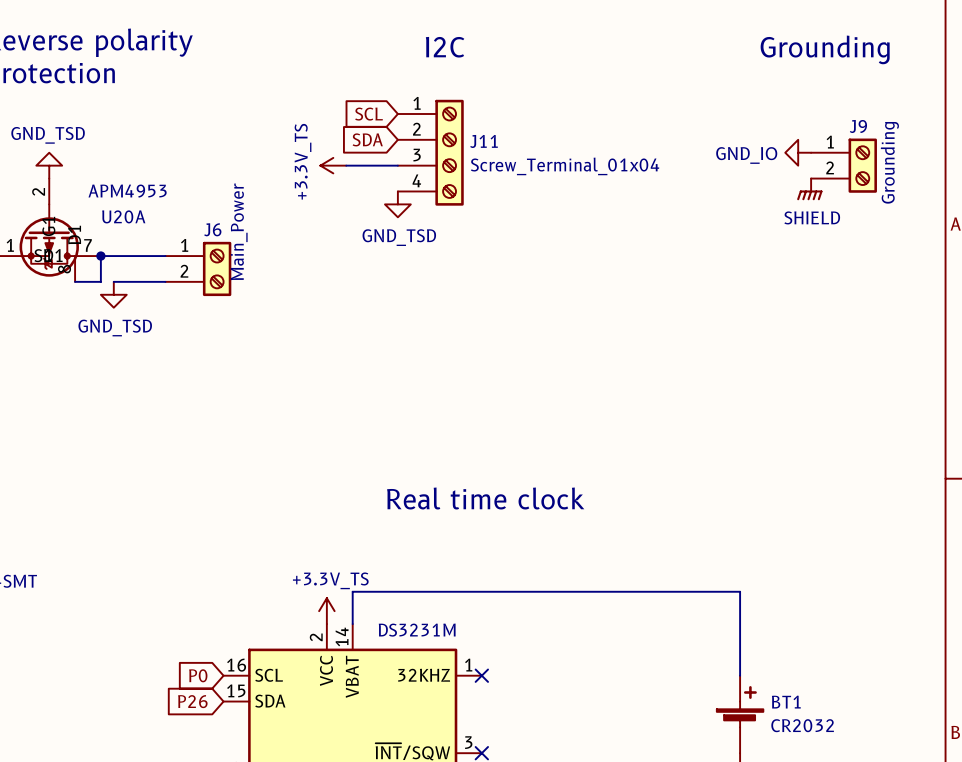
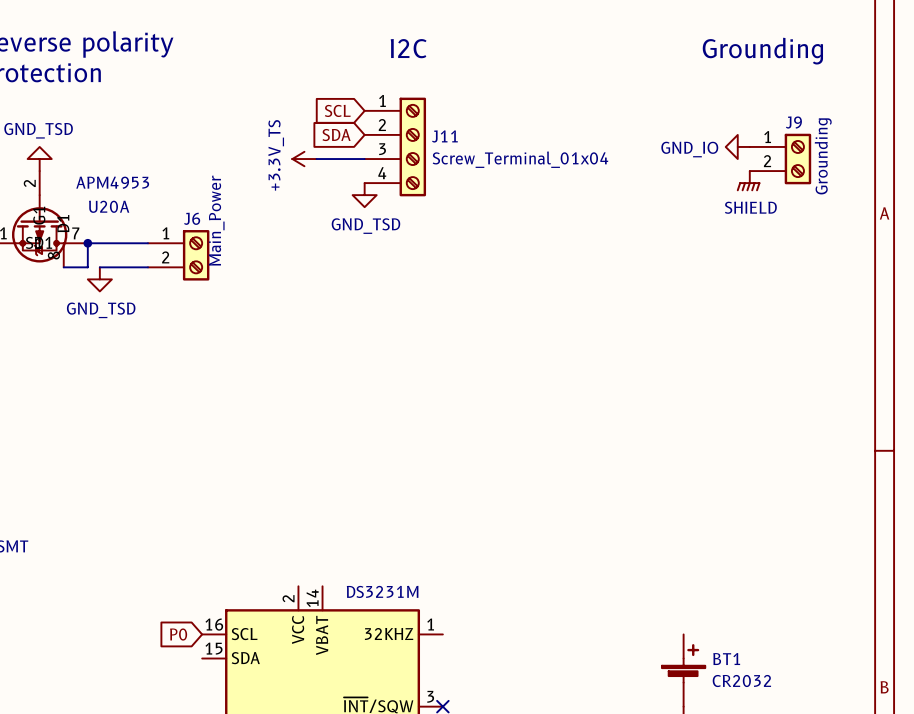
text: Real time clock (485, 498) -> none
power symbol: +3.3V_TS (326, 611) -> none
wire: (352, 624) (352, 591) (740, 591) (740, 675) -> none
no-connect mark: (481, 675) -> none
global label: P26 (192, 701) -> none

